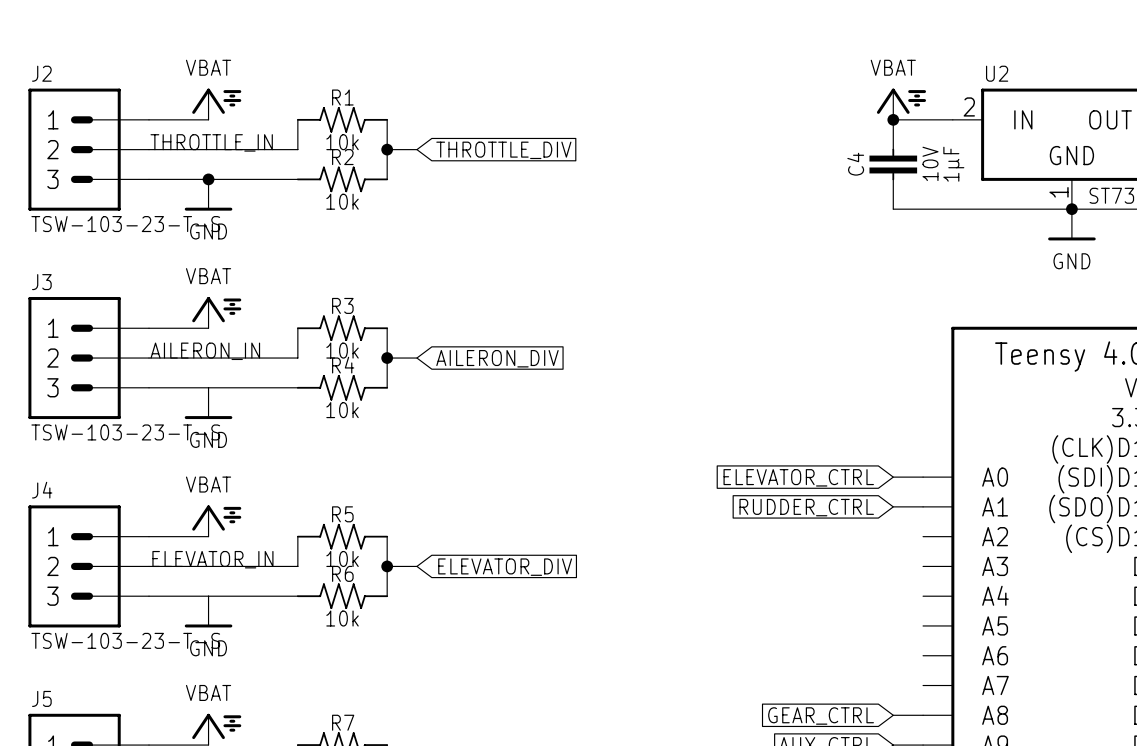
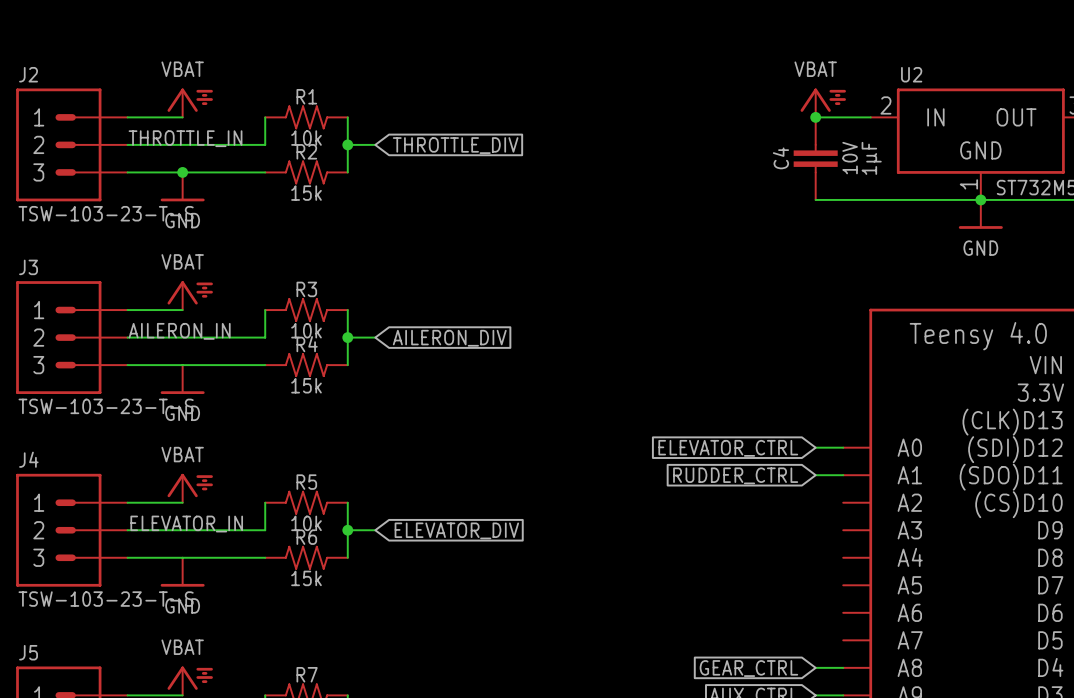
R2 text: 10k (342, 201) -> 15k (306, 193)
R4 text: 10k (342, 410) -> 15k (306, 385)
R6 text: 10k (342, 618) -> 15k (306, 578)

